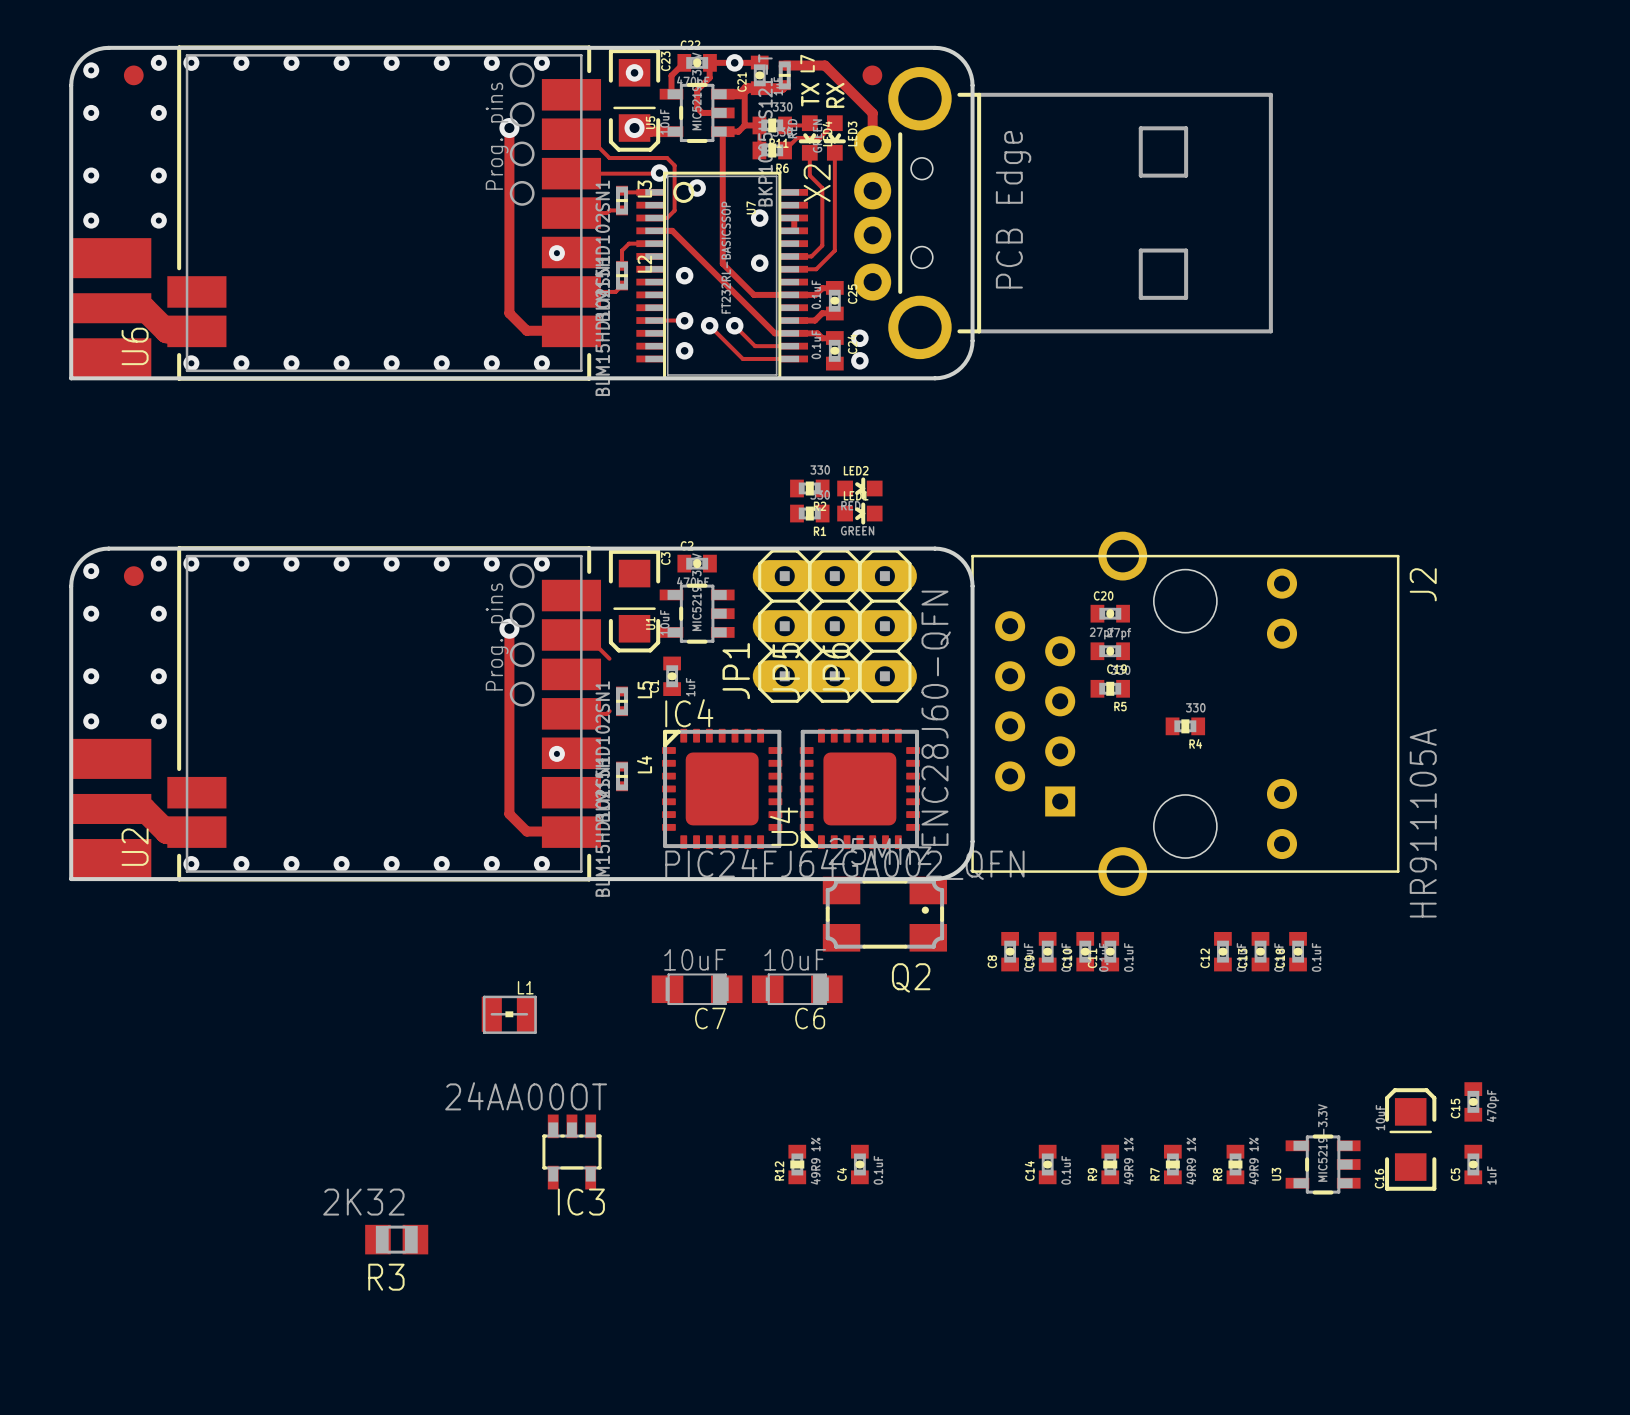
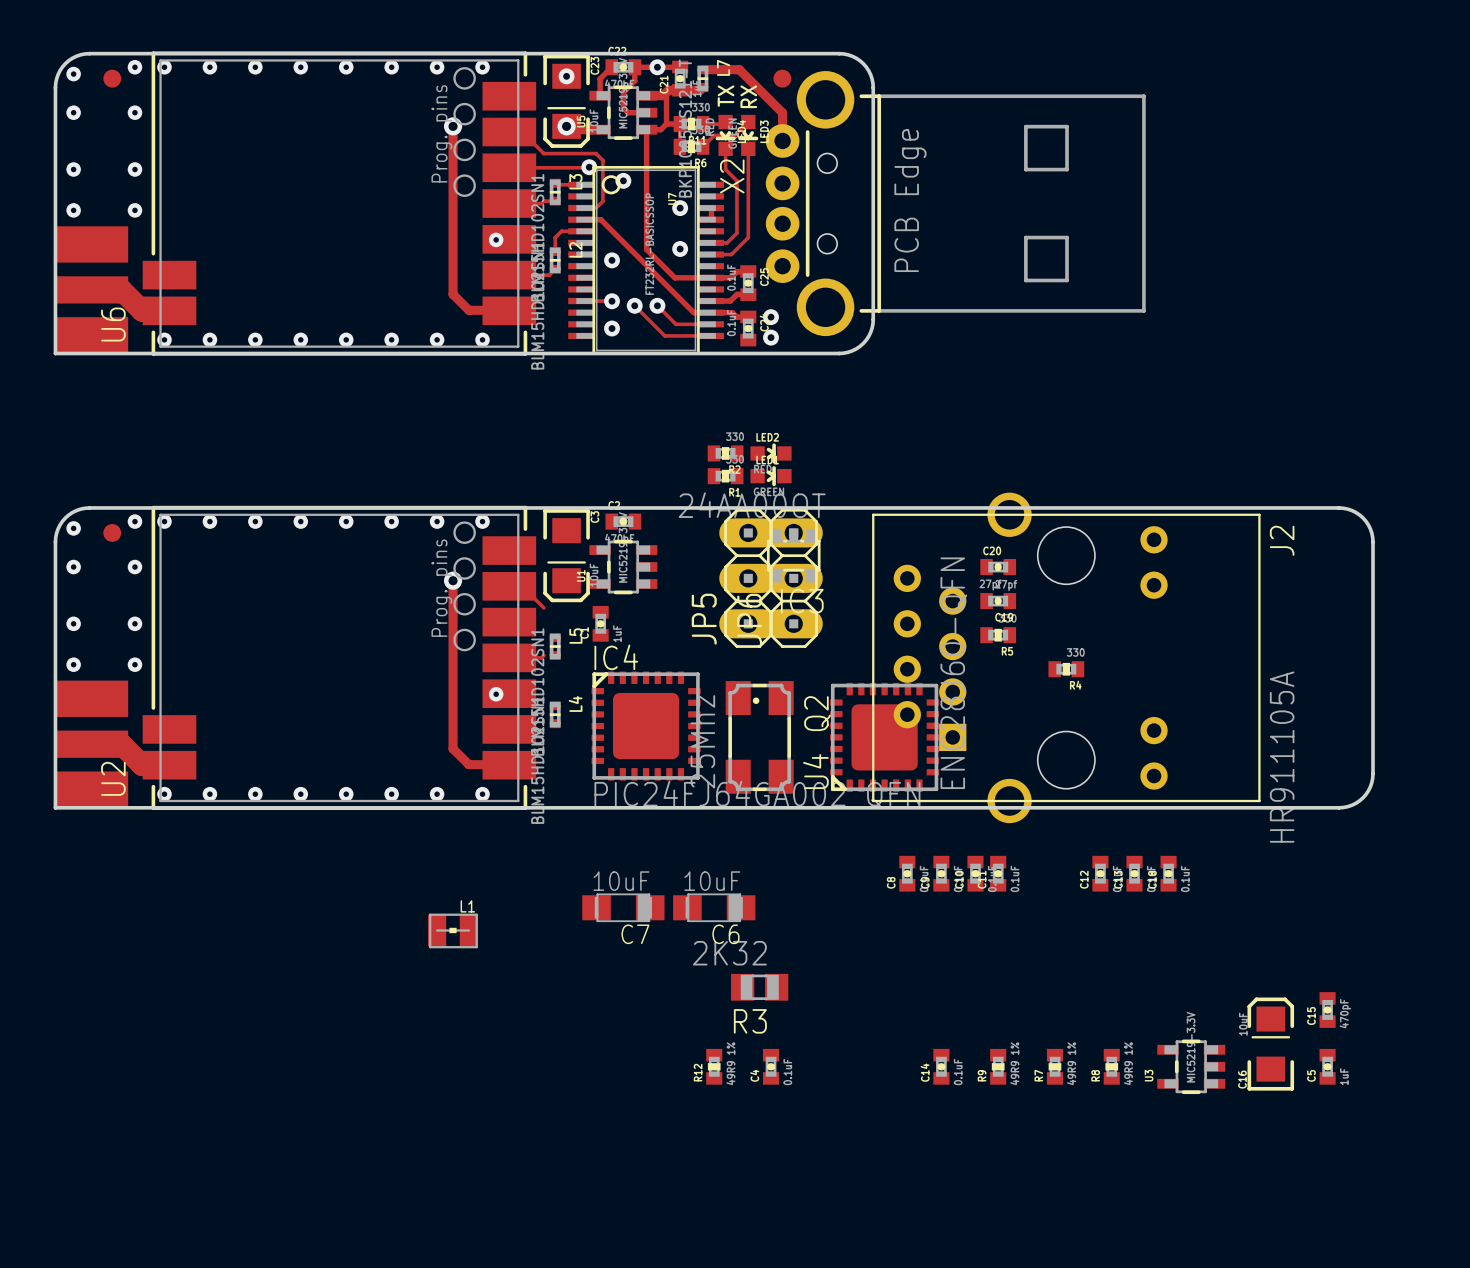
board edge: (934, 548) (949, 551) (961, 559) (969, 571) (972, 586) (972, 846) (967, 860) (957, 871) (944, 877) (934, 879) -> (839, 507) (1338, 507) (1351, 510) (1363, 517) (1370, 529) (1373, 542) (1373, 773) (1368, 790) (1355, 803) (1338, 807) (839, 807)
JP1: (784, 626) -> none
U4 position: (859, 788) -> (884, 737)
Q2 rotation: 0° (884, 914) -> 90° counterclockwise (759, 737)
Q2 position: (884, 914) -> (759, 737)
IC3 position: (571, 1151) -> (793, 555)
R3 position: (396, 1239) -> (759, 987)

